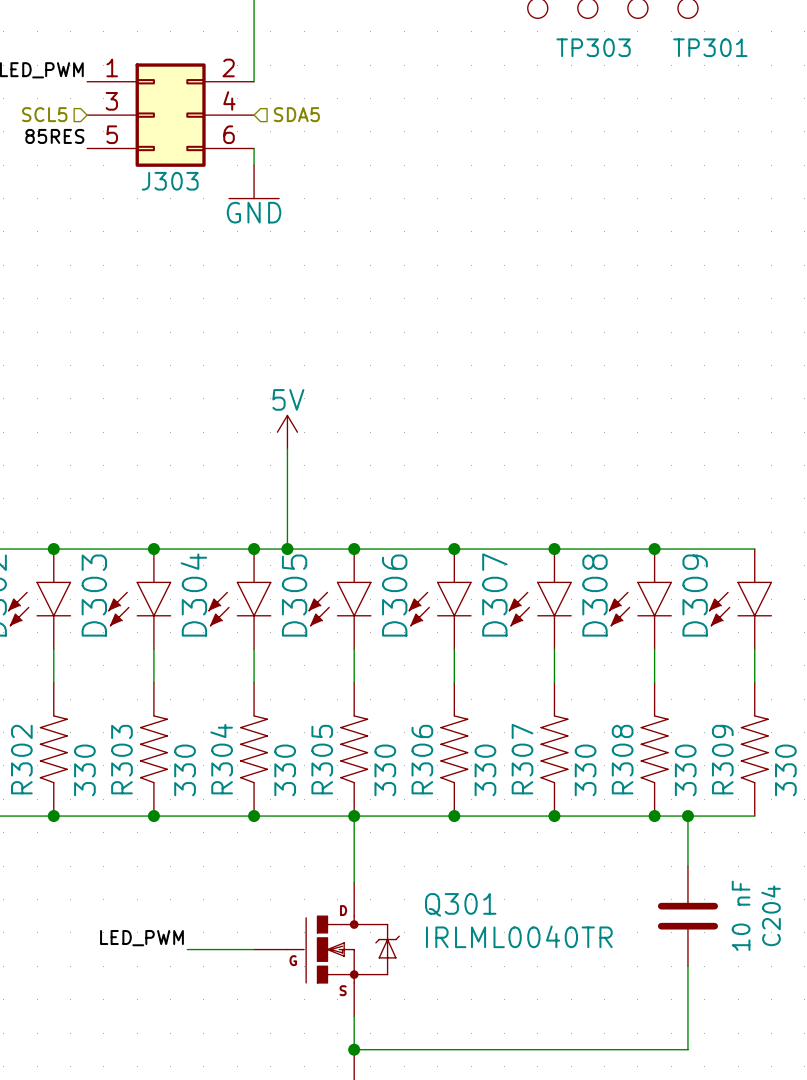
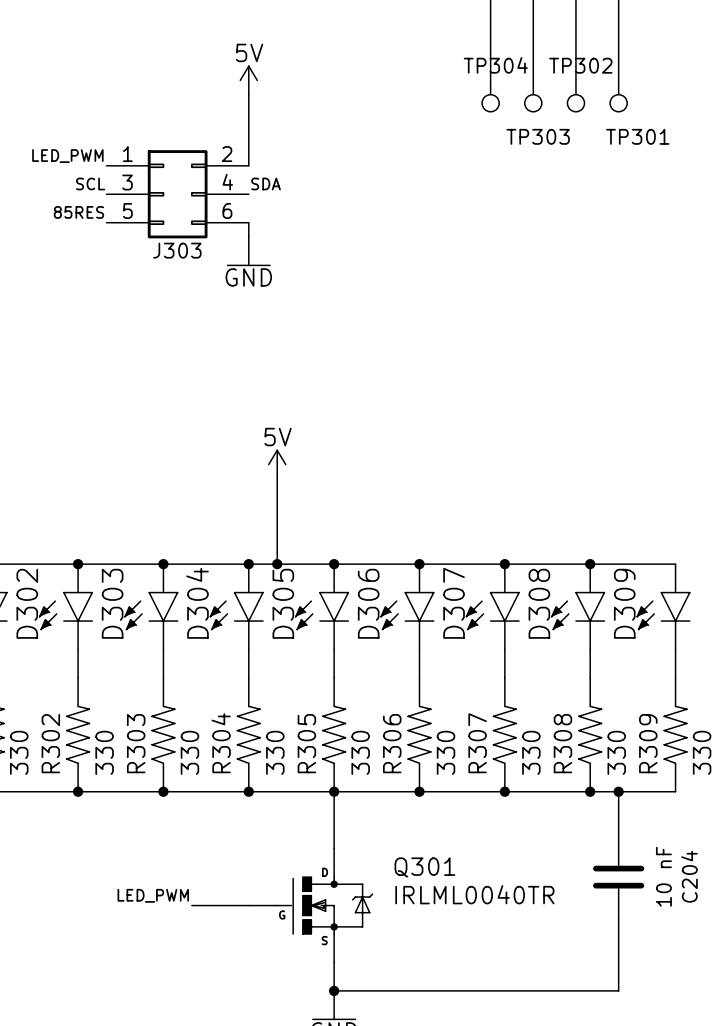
label: none -> SCL (90, 183)
label: none -> SDA (266, 183)
hierarchical label: SCL5 (44, 114) -> none
hierarchical label: SDA5 (296, 114) -> none

